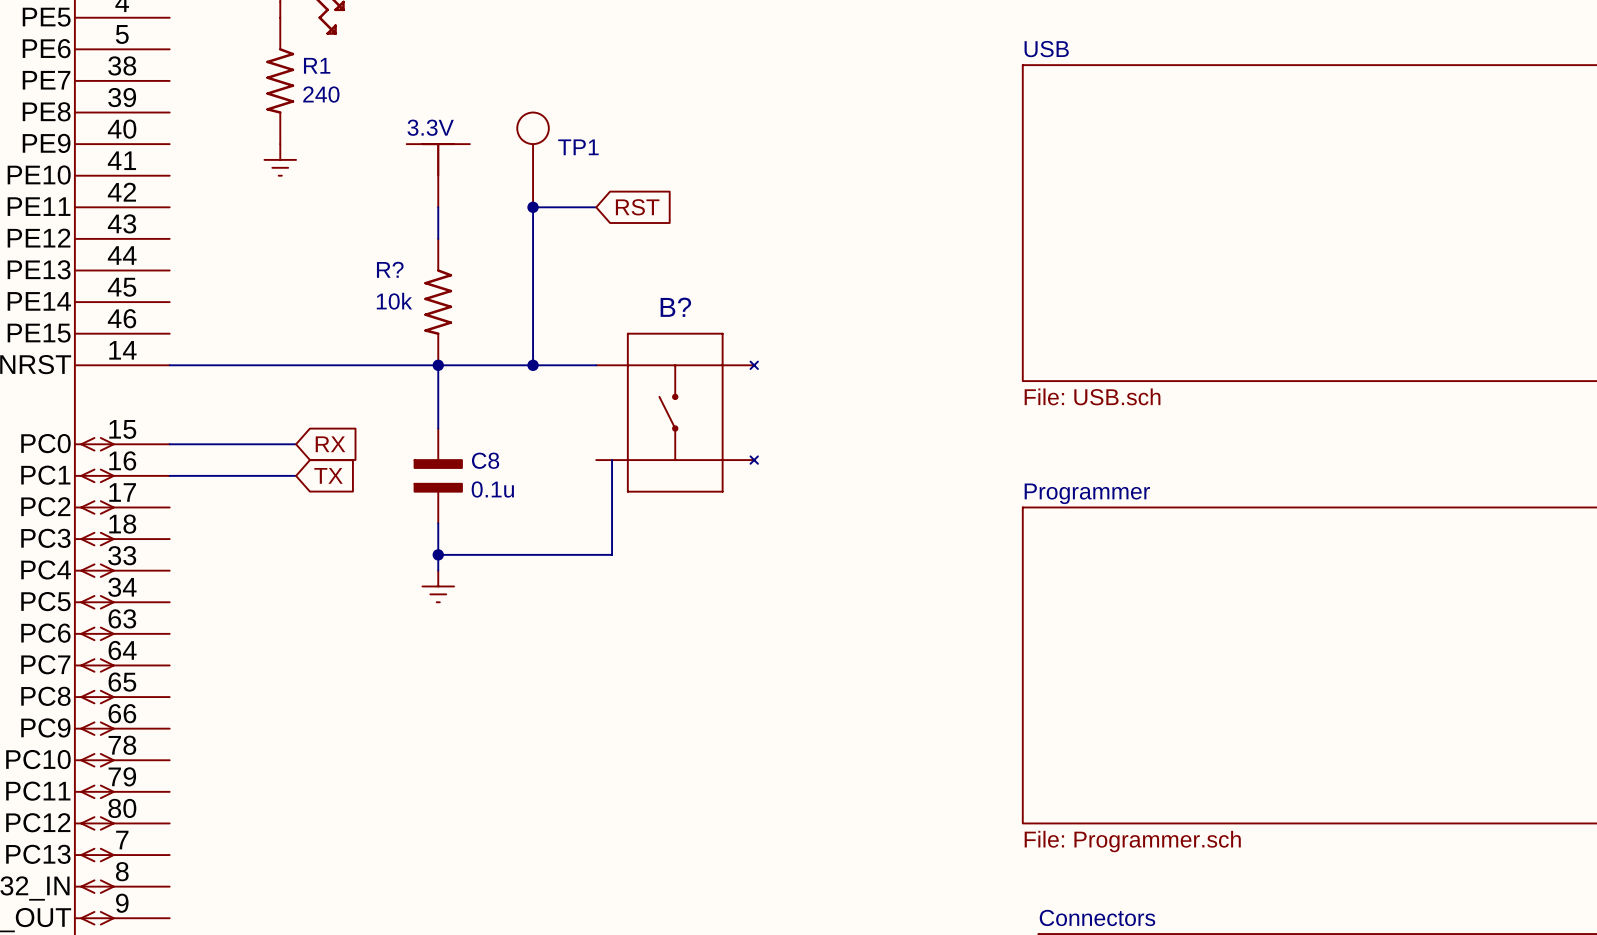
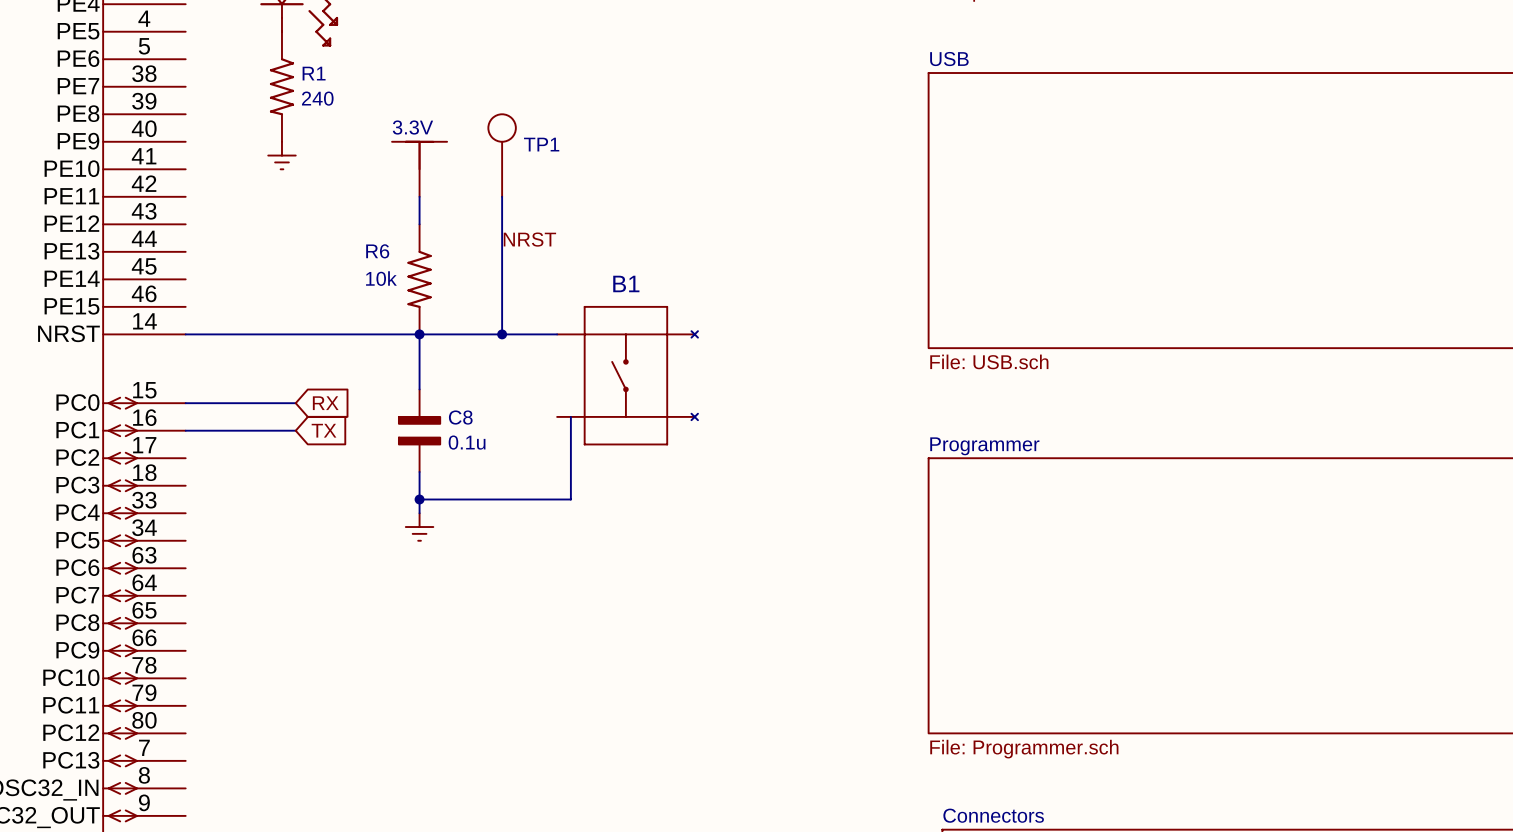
wire: (533, 207) (596, 207) -> none
junction: (533, 207) -> none
global label: RST (637, 207) -> none
label: none -> NRST (529, 239)
R? name: R? (390, 269) -> R6 (377, 251)
B? name: B? (675, 307) -> B1 (626, 283)

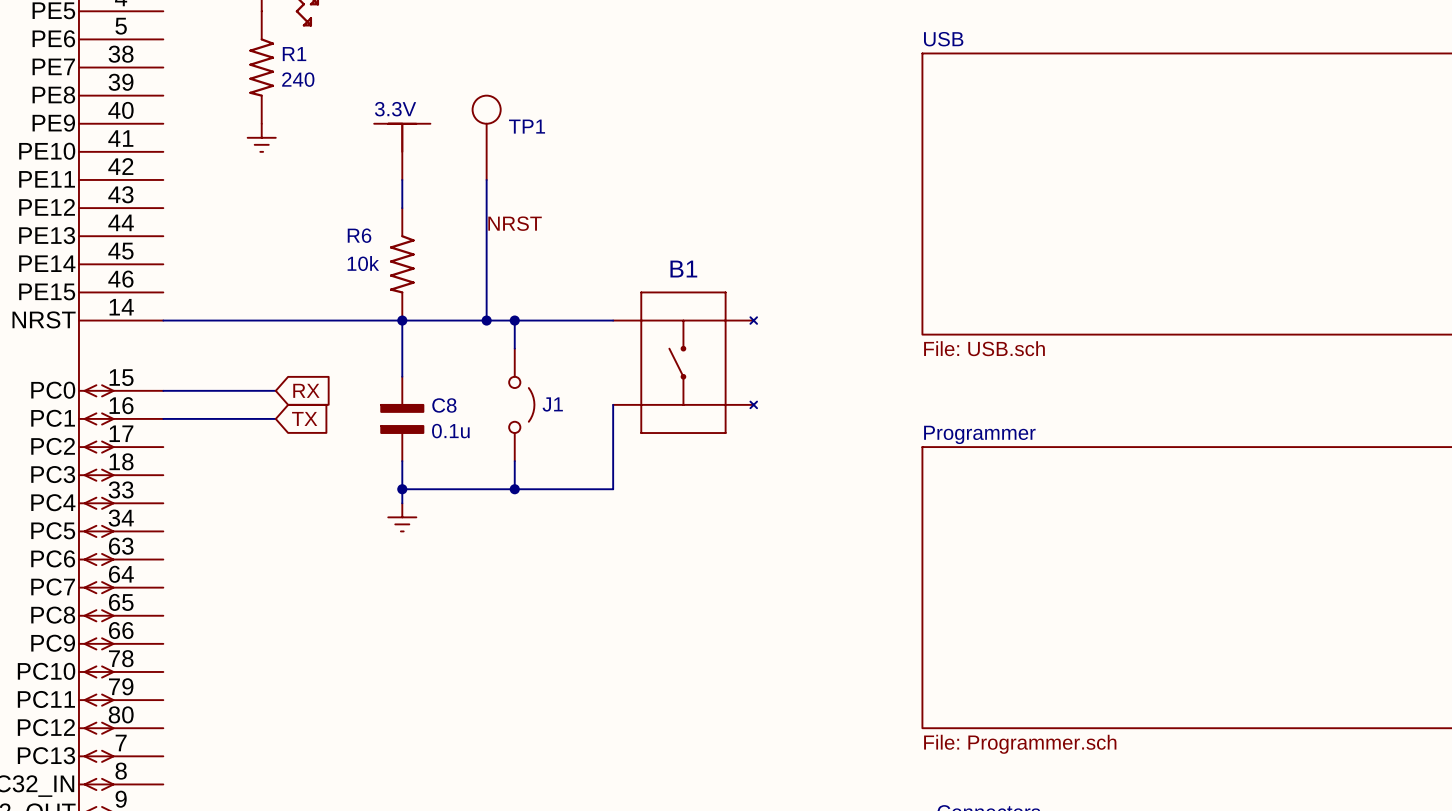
wire: none -> (514, 320) (514, 348)
junction: none -> (514, 320)
B1 position: (627, 375) -> (685, 362)
J1: none -> (521, 404)
wire: (570, 416) (570, 499) -> (613, 404) (613, 489) (556, 489)
wire: none -> (514, 461) (514, 489)
junction: none -> (514, 489)

